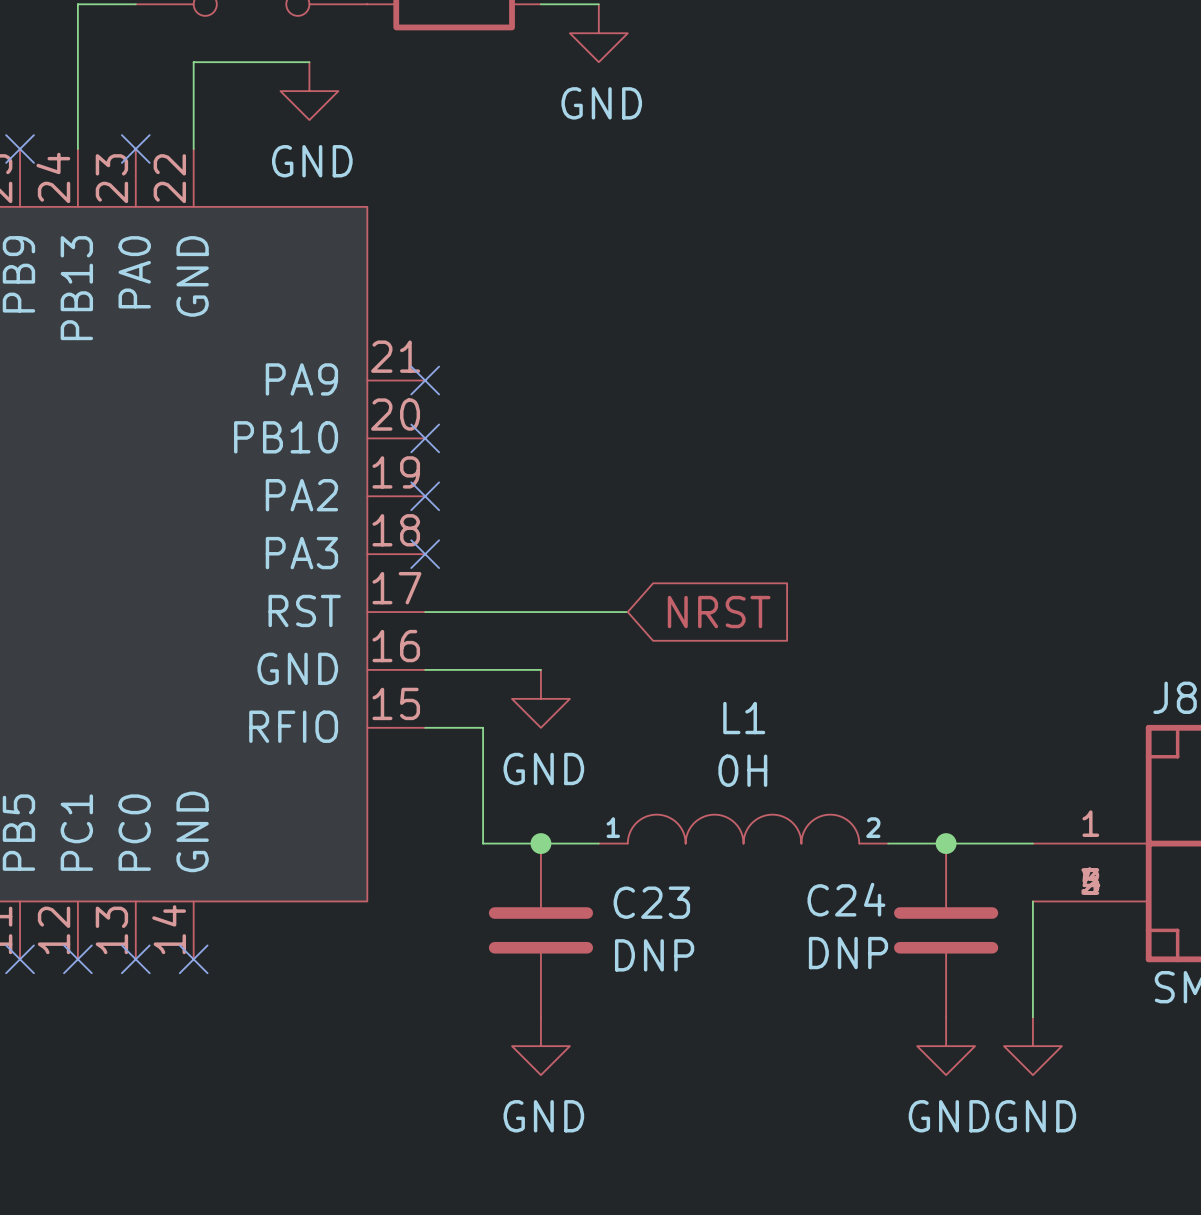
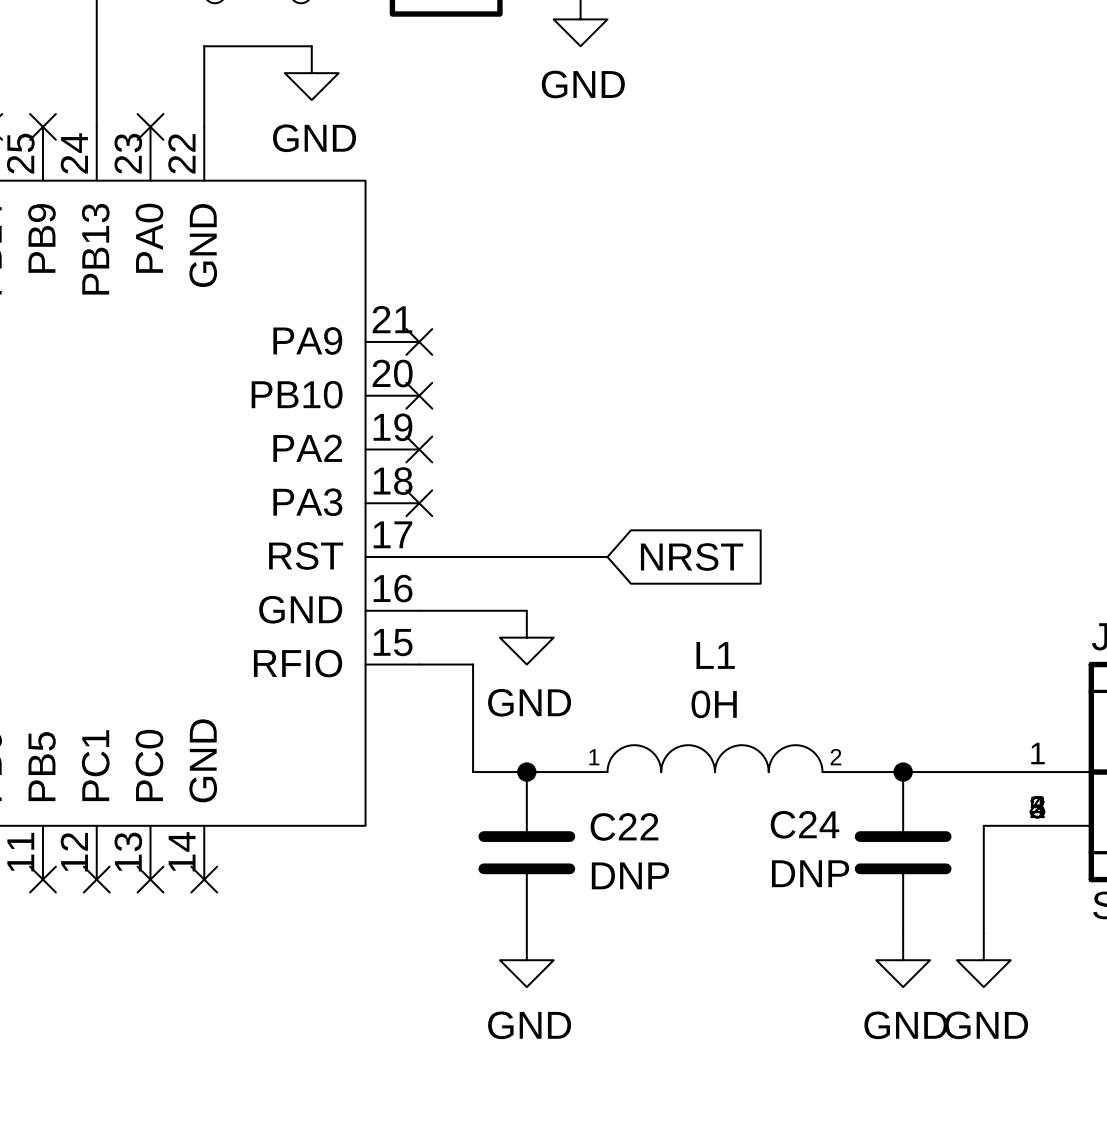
C23 name: C23 (651, 902) -> C22 (624, 826)

